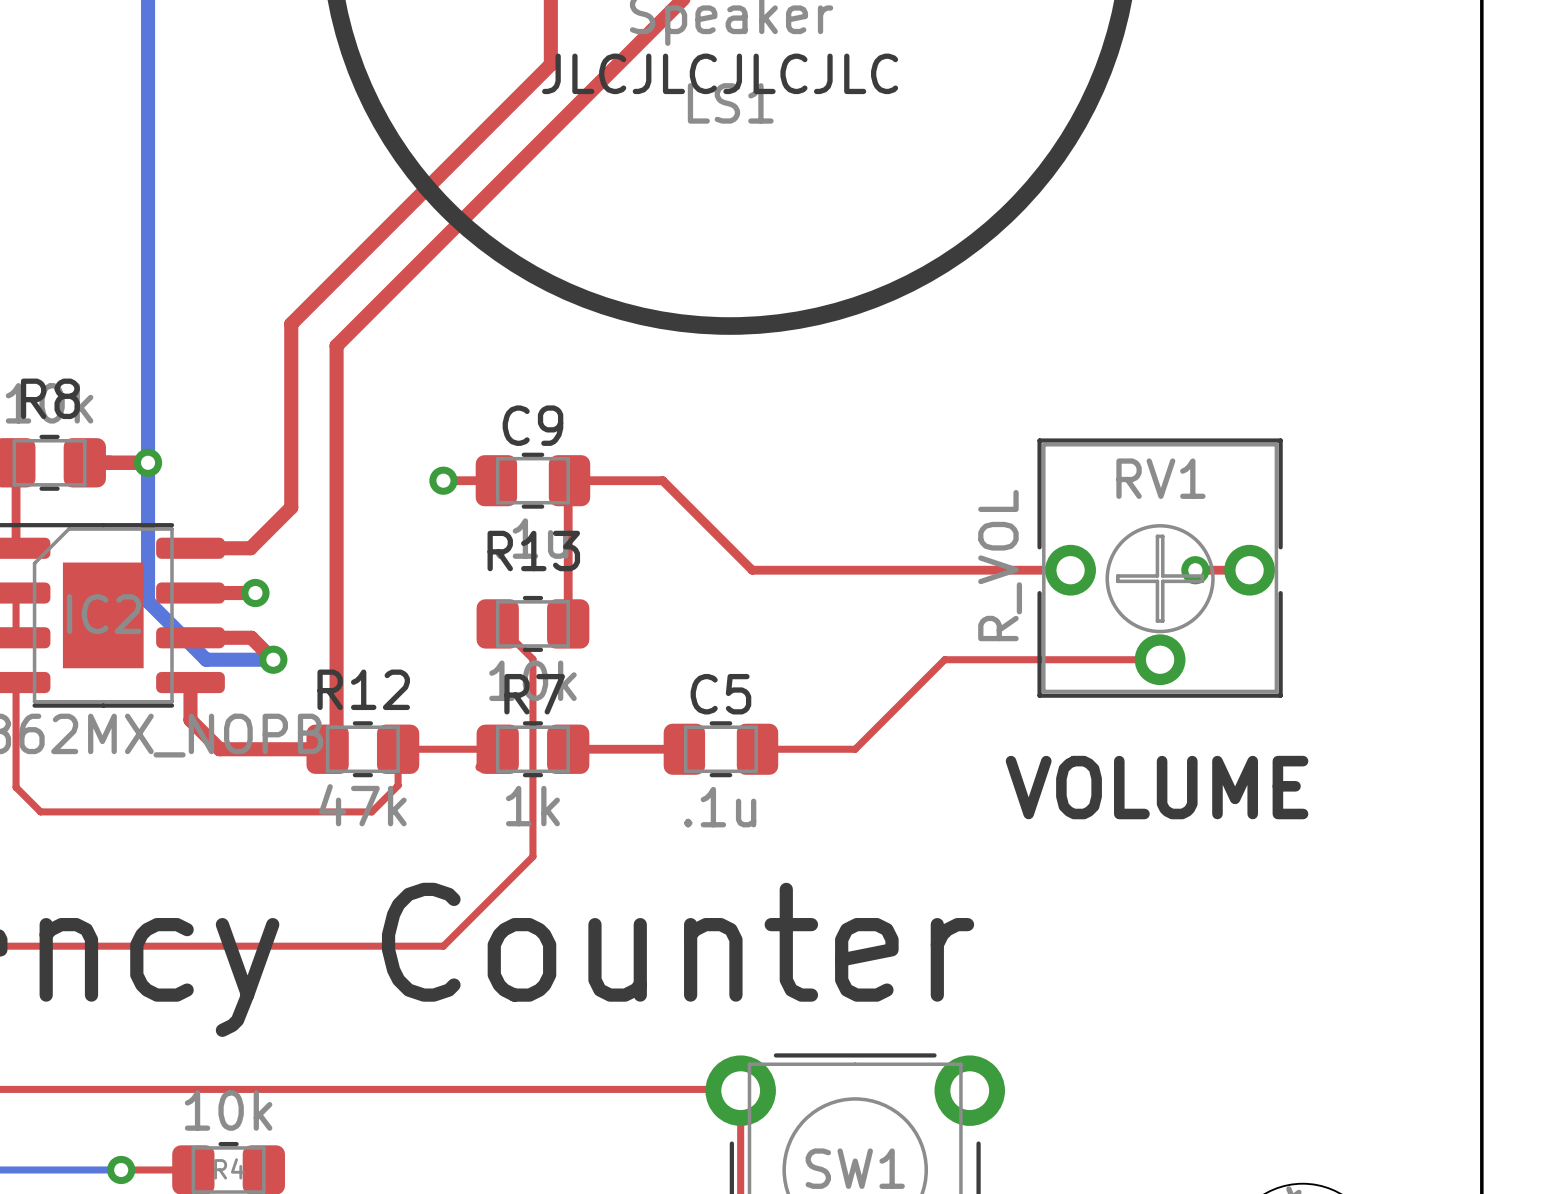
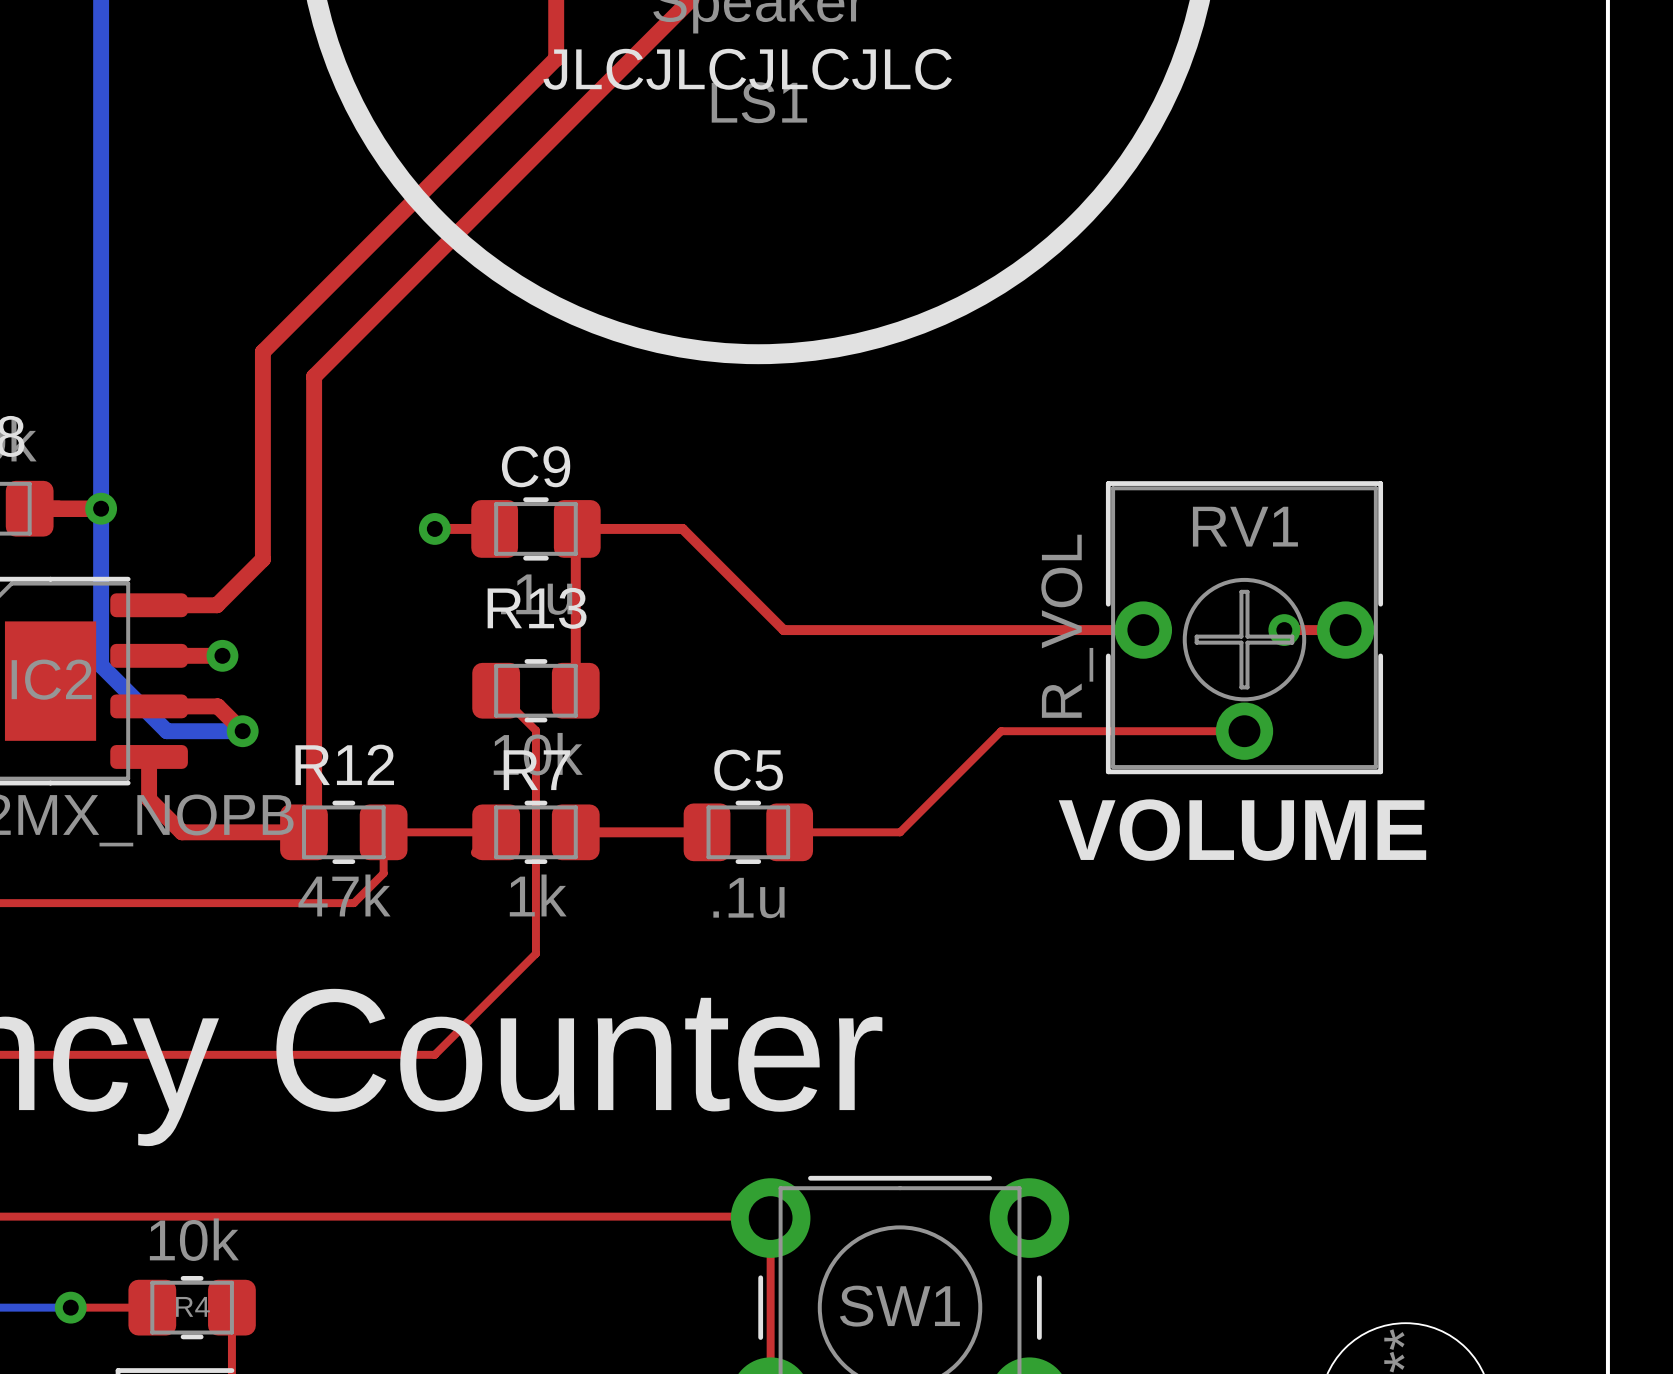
text position: VOLUME (1157, 787) -> VOLUME (1242, 830)

